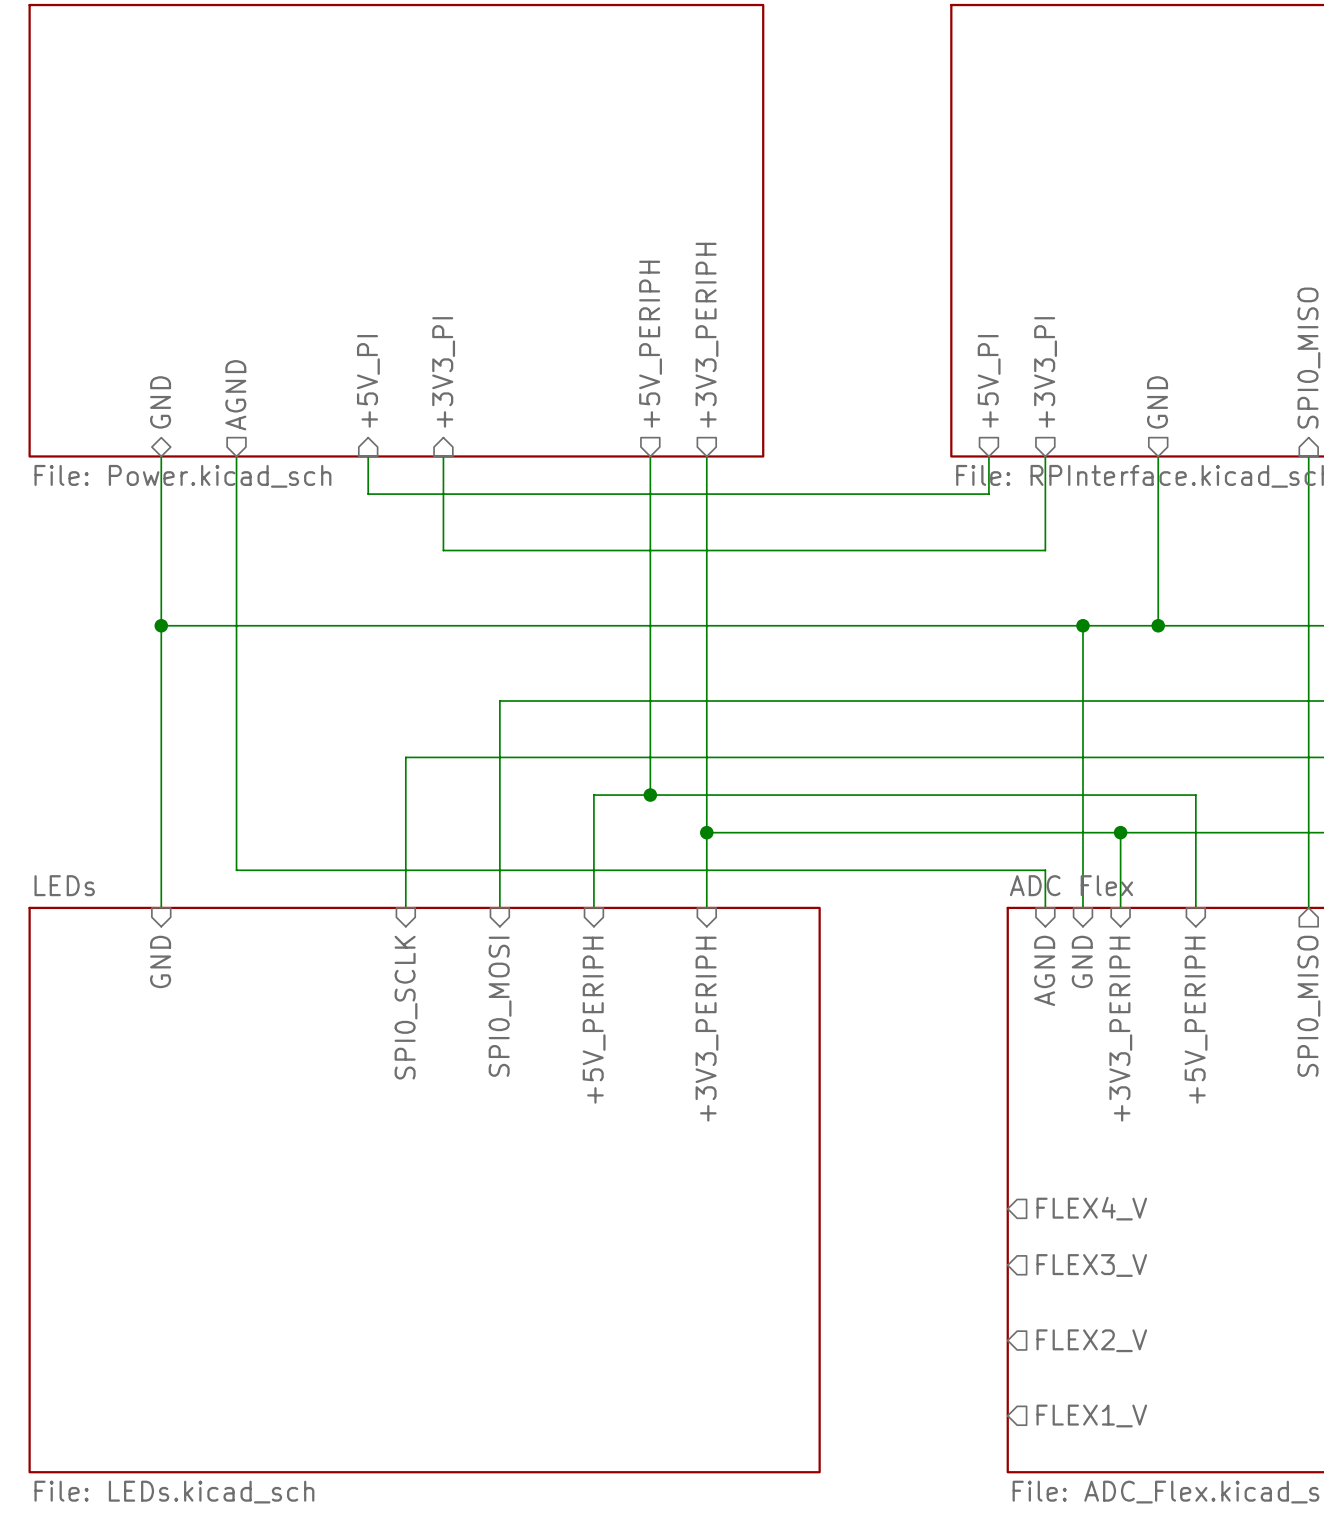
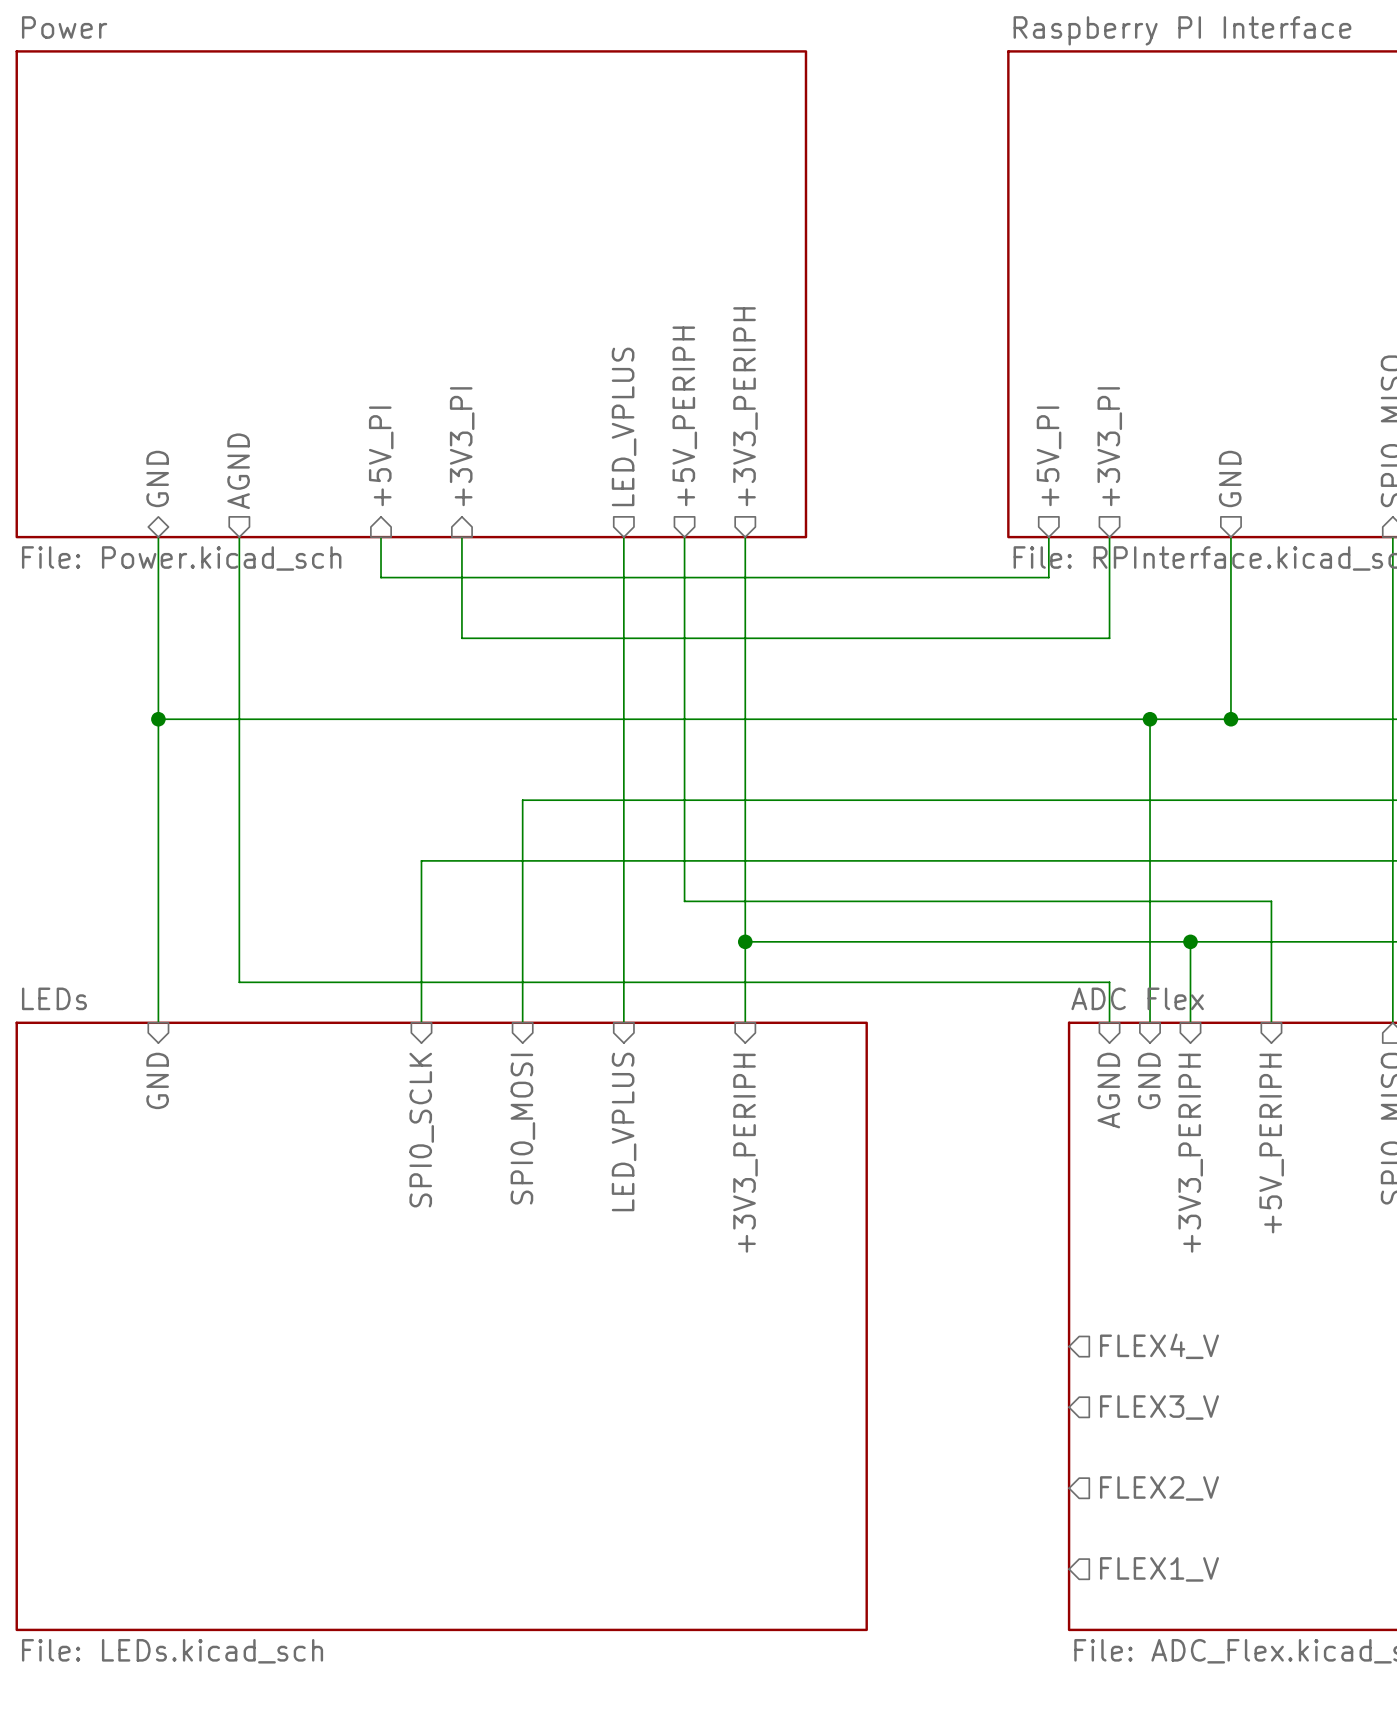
sheet pin: none -> LED_VPLUS (624, 426)
wire: (593, 795) (650, 795) -> (623, 901) (623, 537)
junction: (650, 795) -> none
sheet pin: +5V_PERIPH (594, 1020) -> LED_VPLUS (624, 1132)

